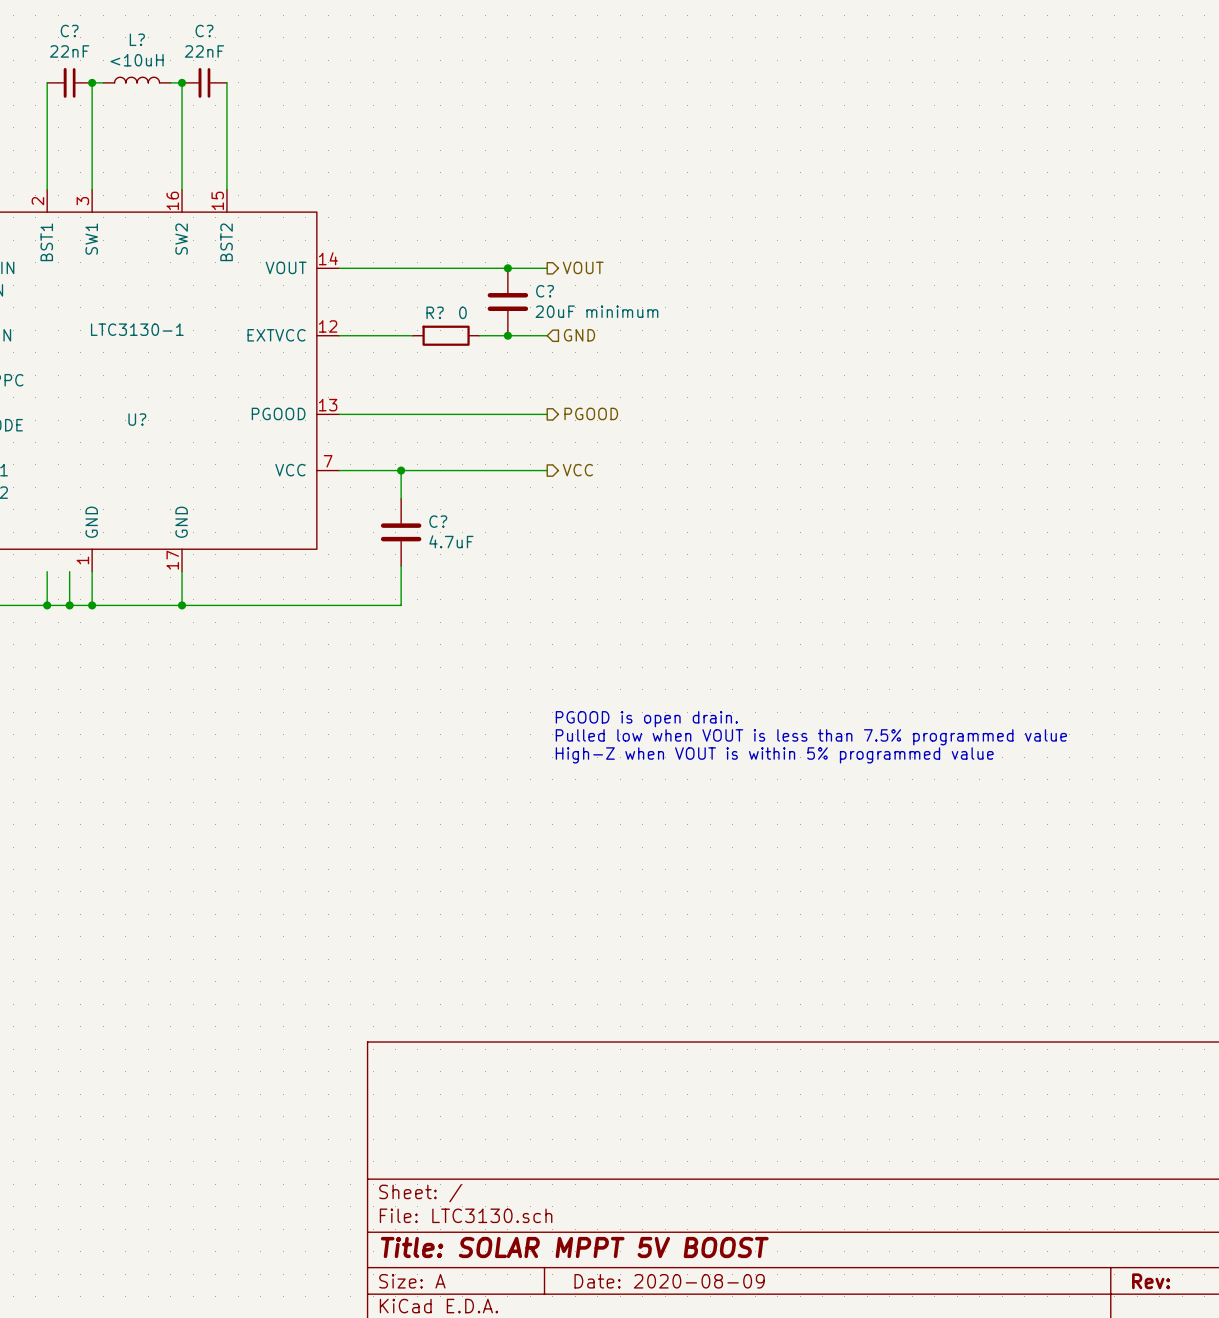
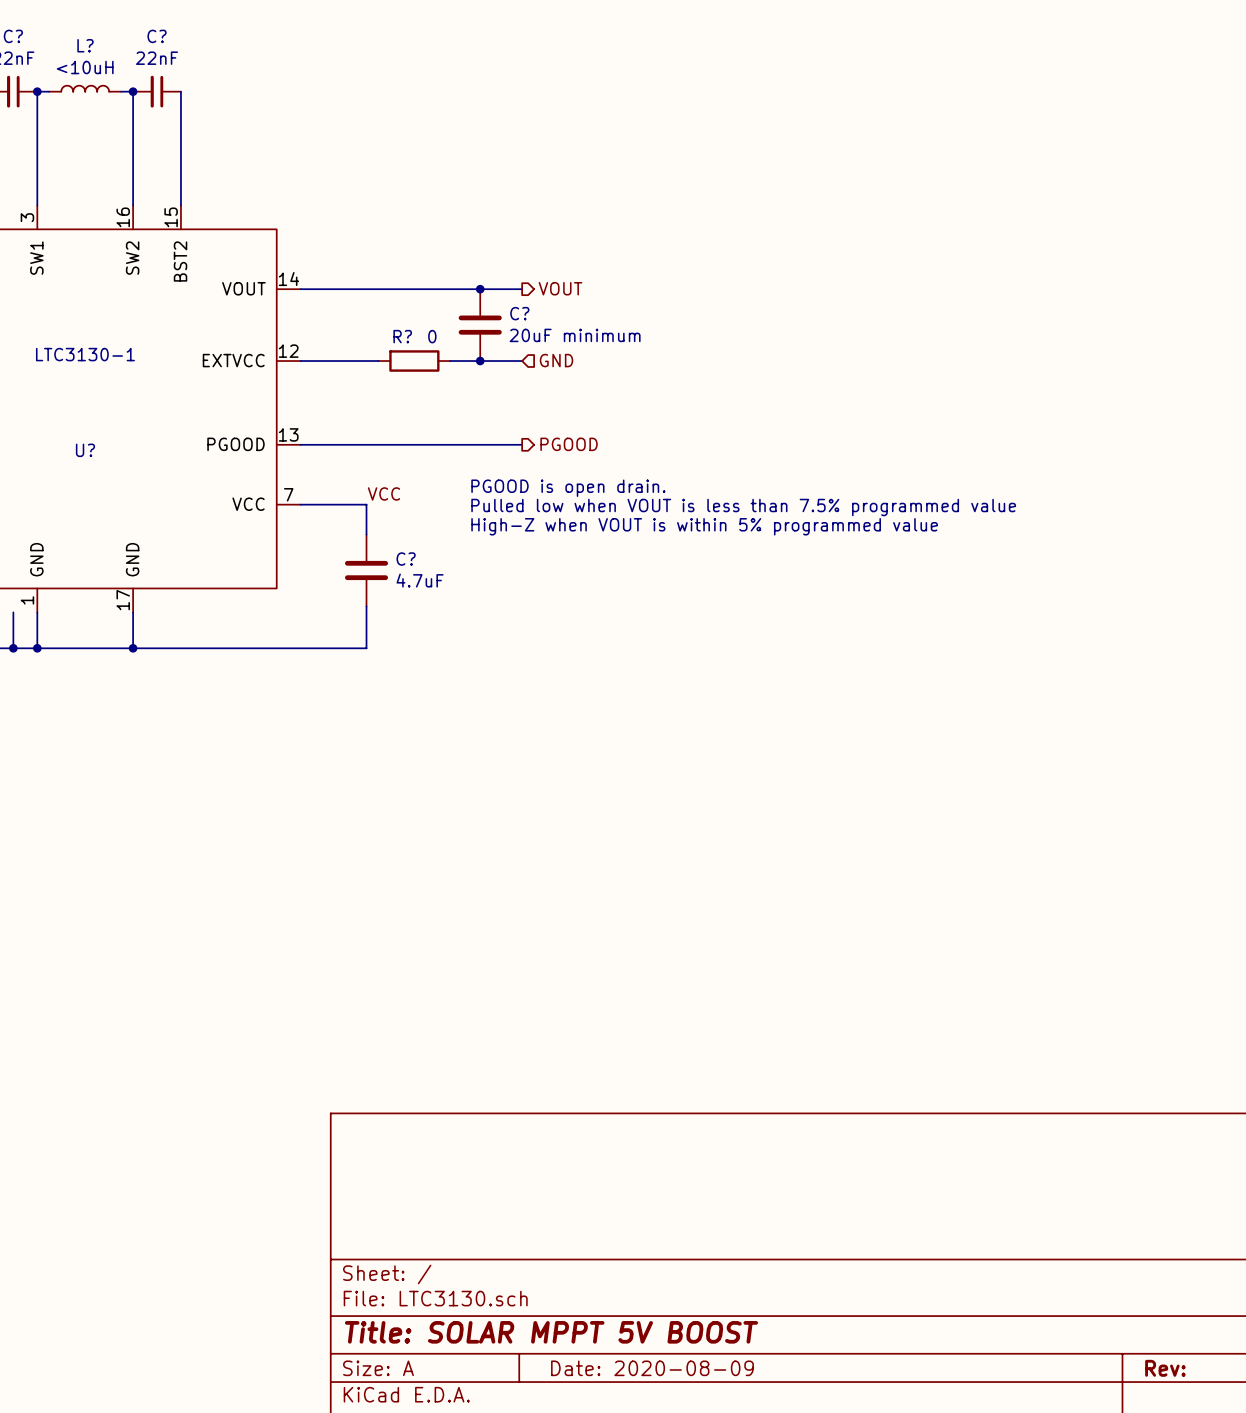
text: none -> PGOOD is open drain. (568, 488)
label: none -> VCC (383, 493)
wire: (401, 470) (547, 470) -> none
junction: (401, 470) -> none
hierarchical label: VCC (577, 470) -> none
text: none -> Pulled low when VOUT is less than 7.5% programmed value (743, 507)
text: none -> High-Z when VOUT is within 5% programmed value (704, 526)
text: PGOOD is open drain. (646, 719) -> none
text: Pulled low when VOUT is less than 7.5% programmed value (811, 737) -> none
text: High-Z when VOUT is within 5% programmed value (774, 755) -> none

